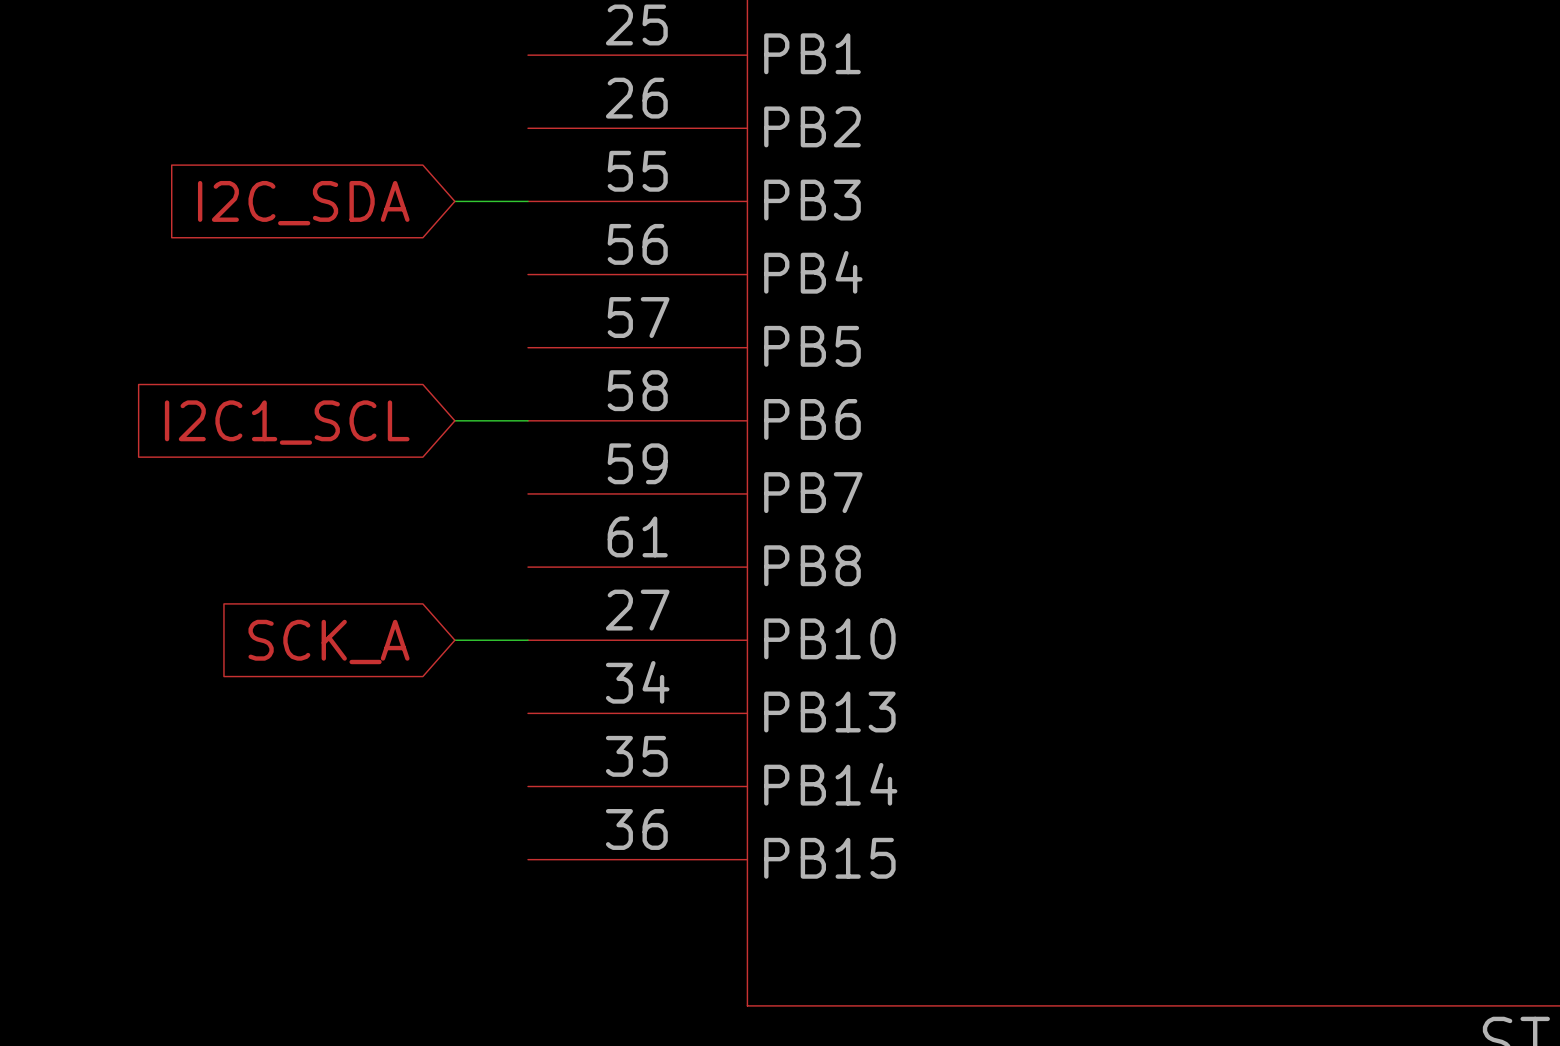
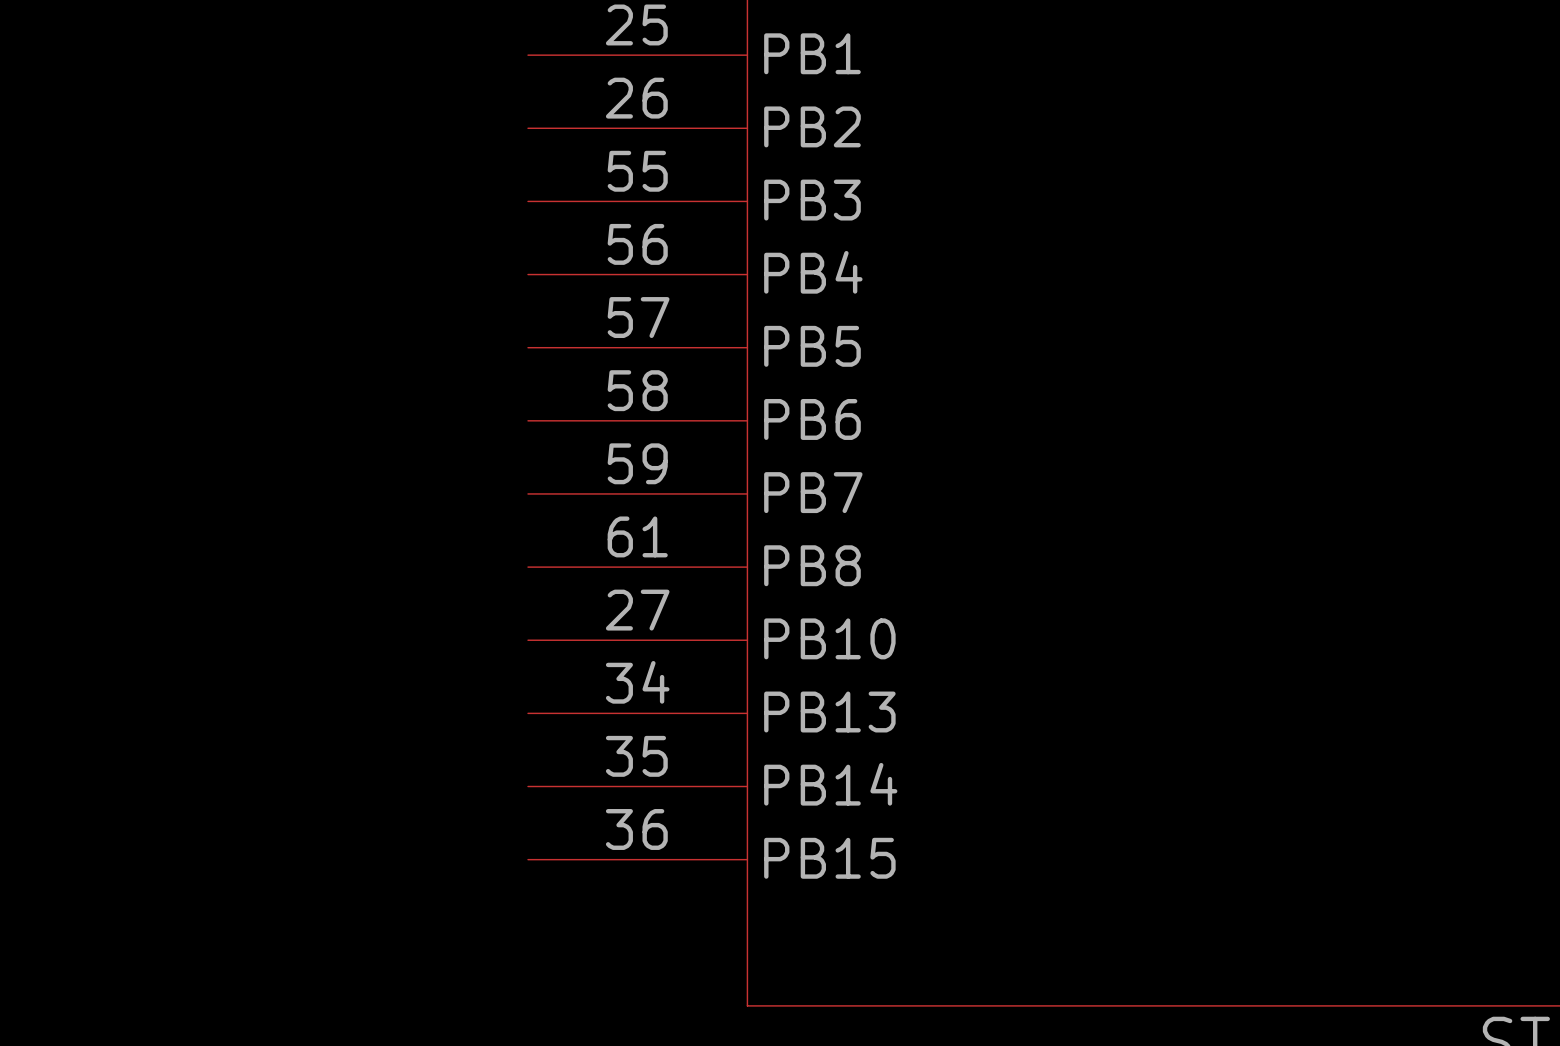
wire: (454, 201) (528, 201) -> none
global label: I2C_SDA (303, 203) -> none
wire: (454, 420) (528, 420) -> none
global label: I2C1_SCL (287, 422) -> none
wire: (454, 640) (528, 640) -> none
global label: SCK_A (329, 641) -> none

